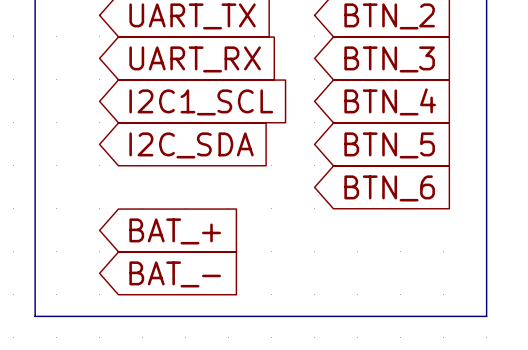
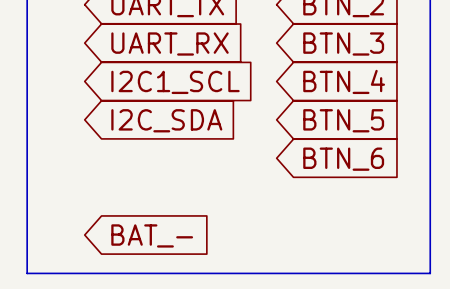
global label: BAT_+ (175, 231) -> none

